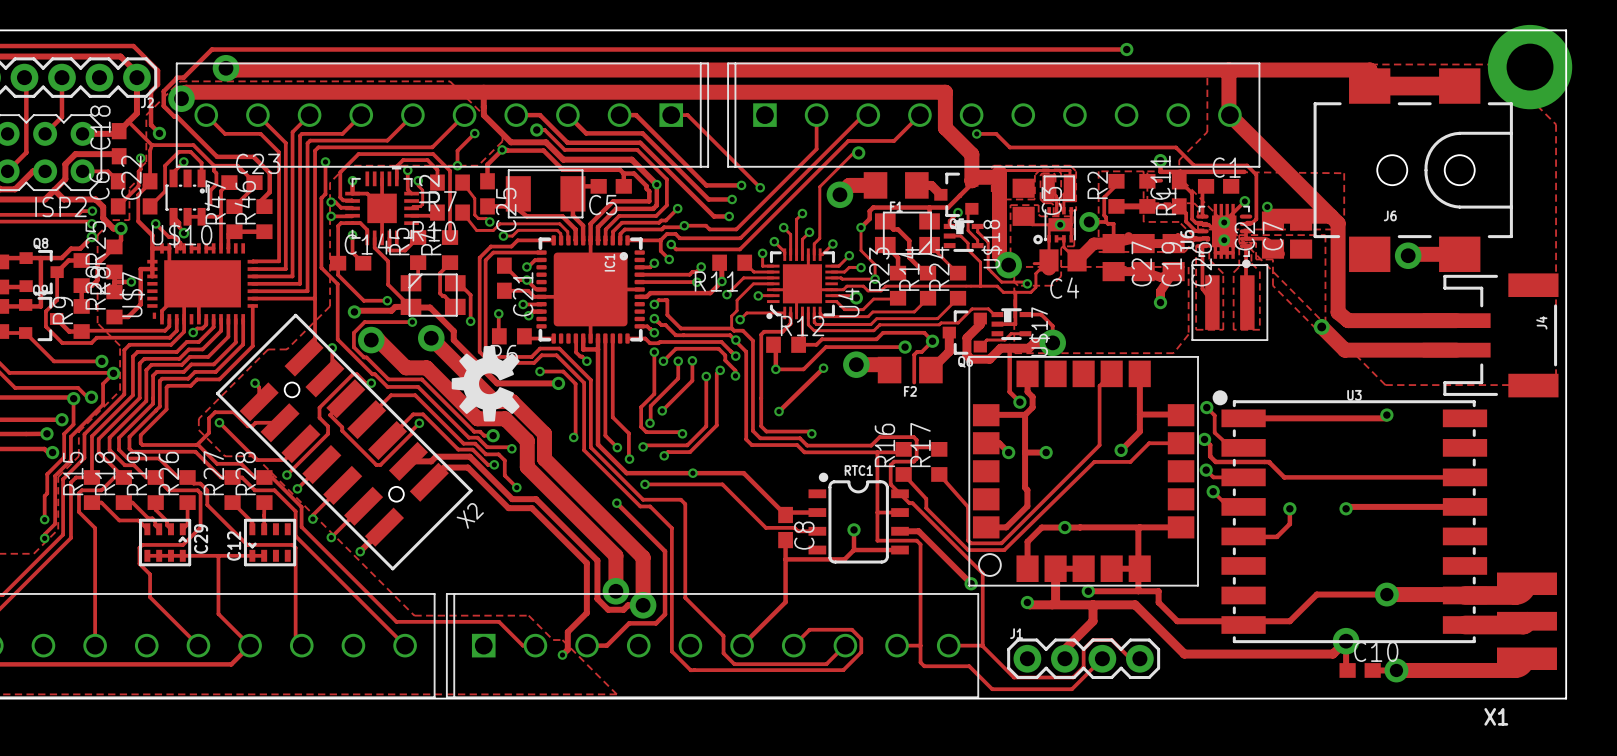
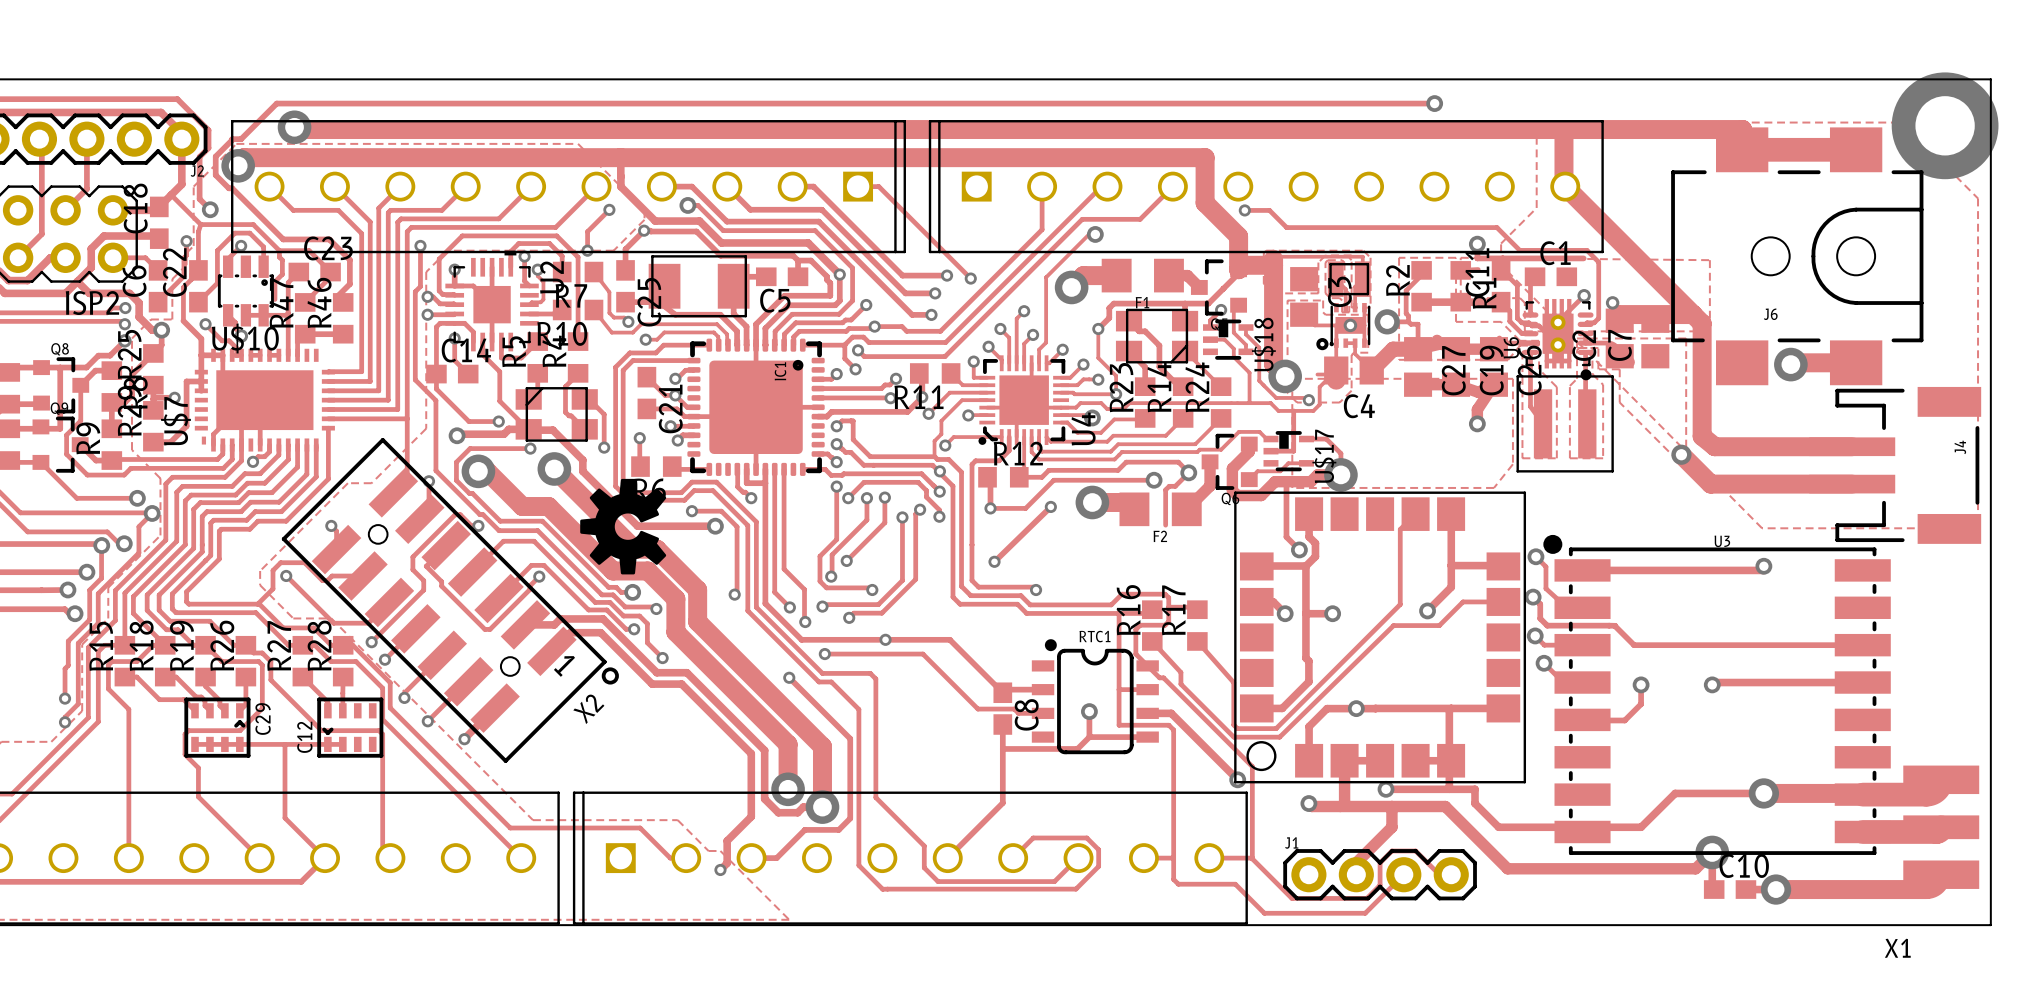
X2 footprint: [215, 313, 473, 571] -> [281, 438, 619, 763]

